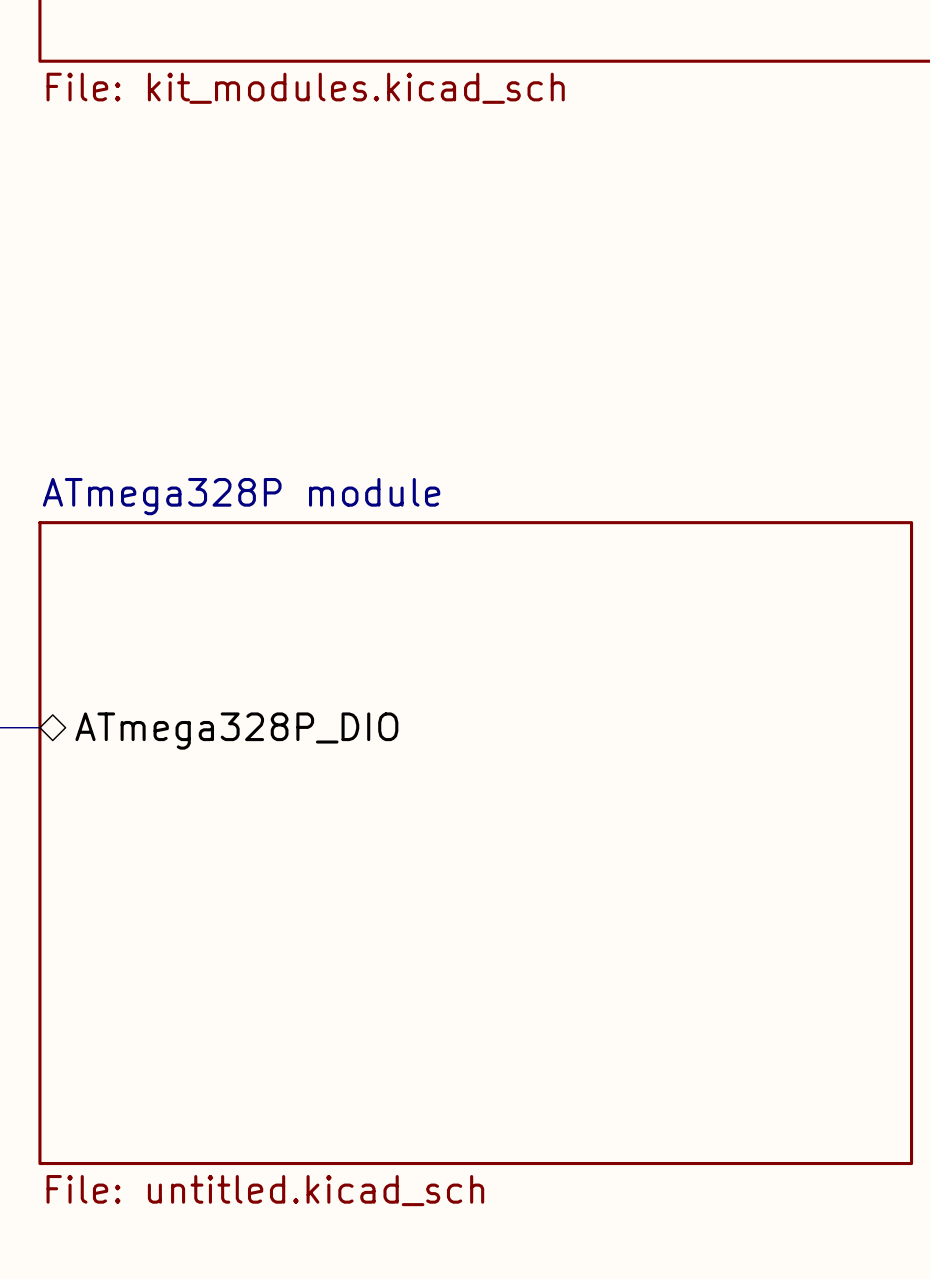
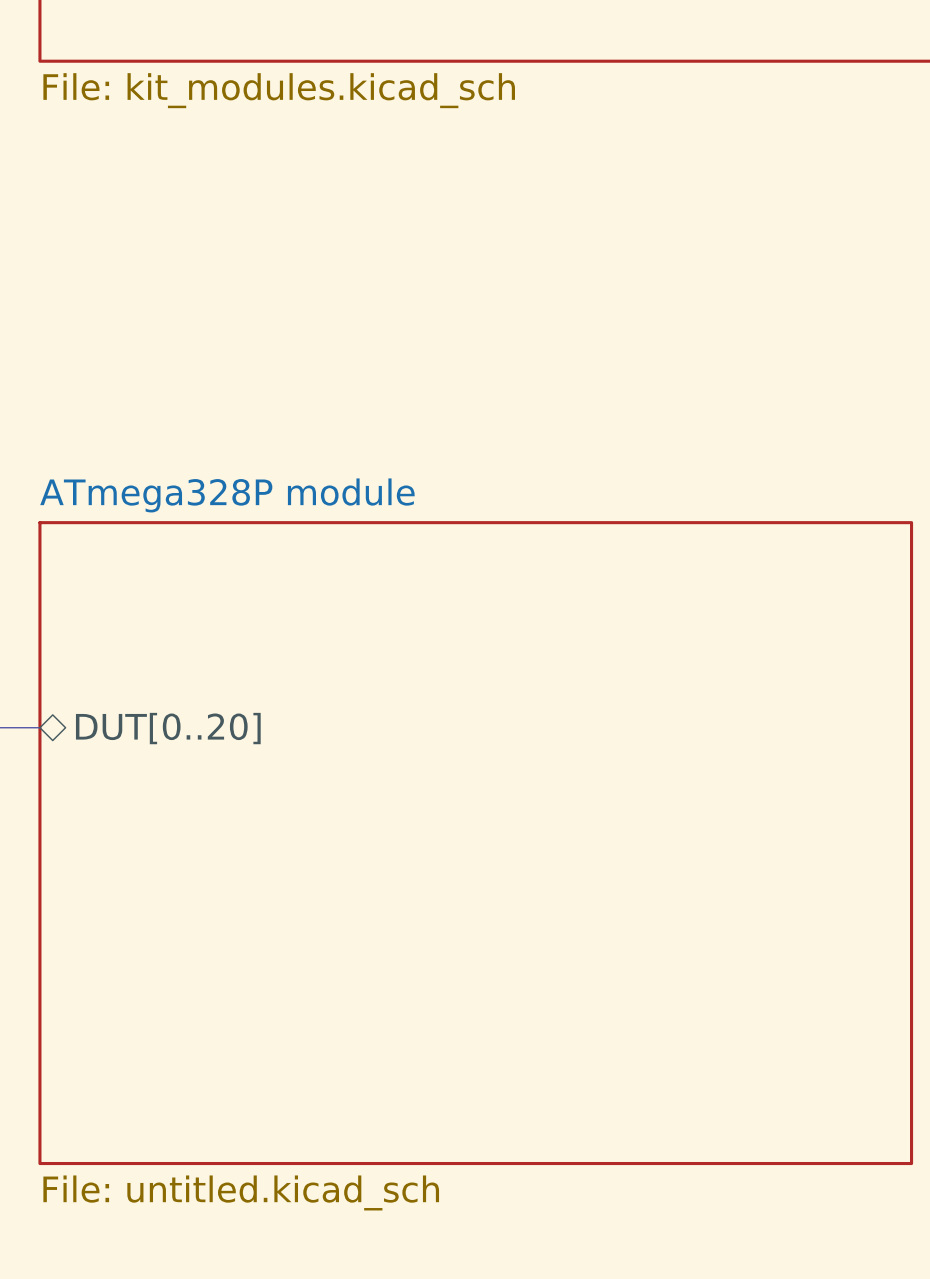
sheet pin: ATmega328P_DIO (236, 731) -> DUT[0..20] (168, 728)

